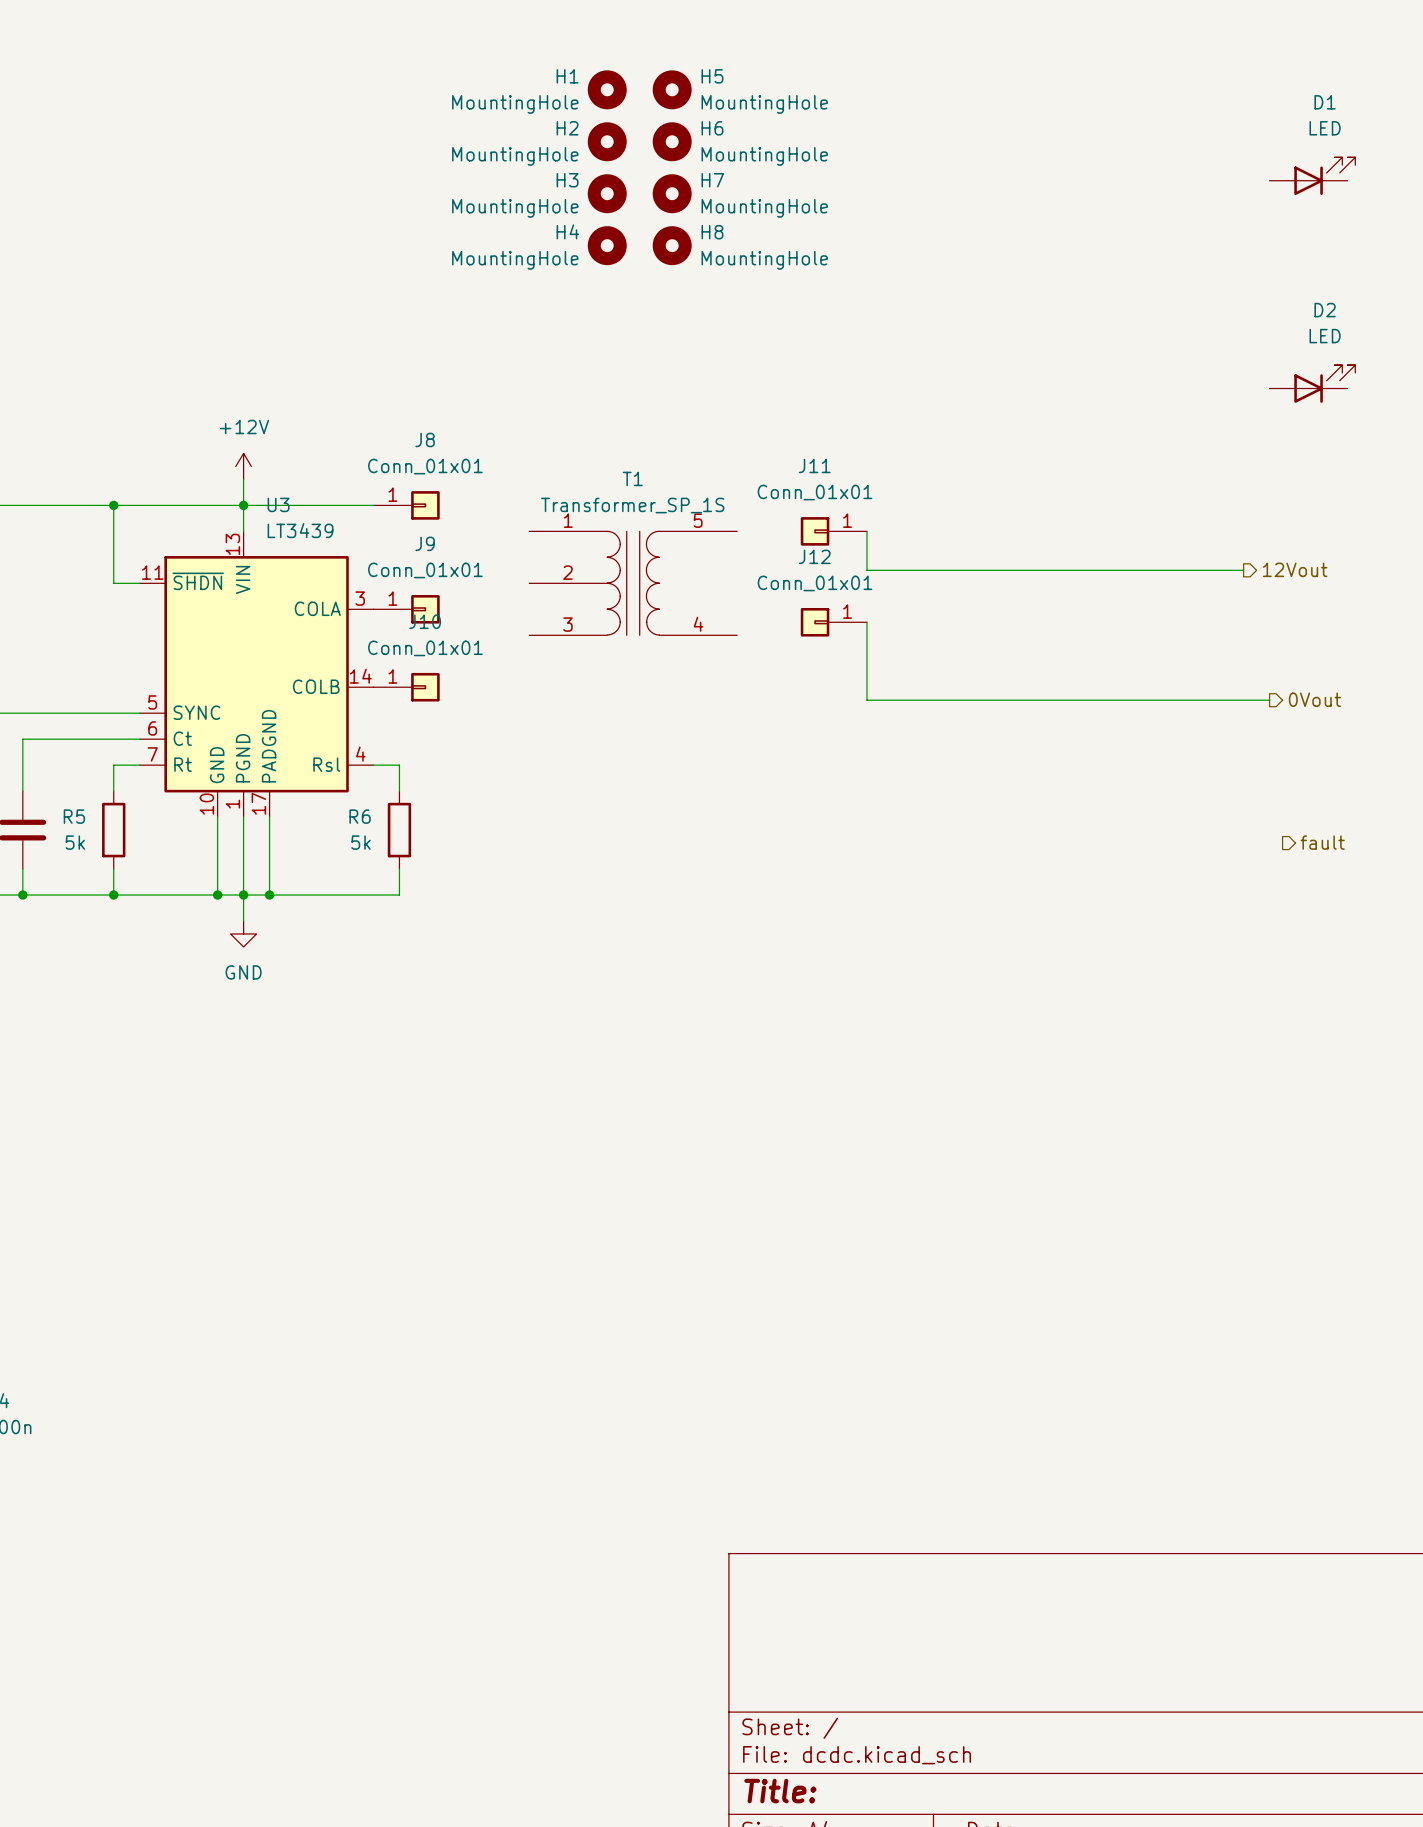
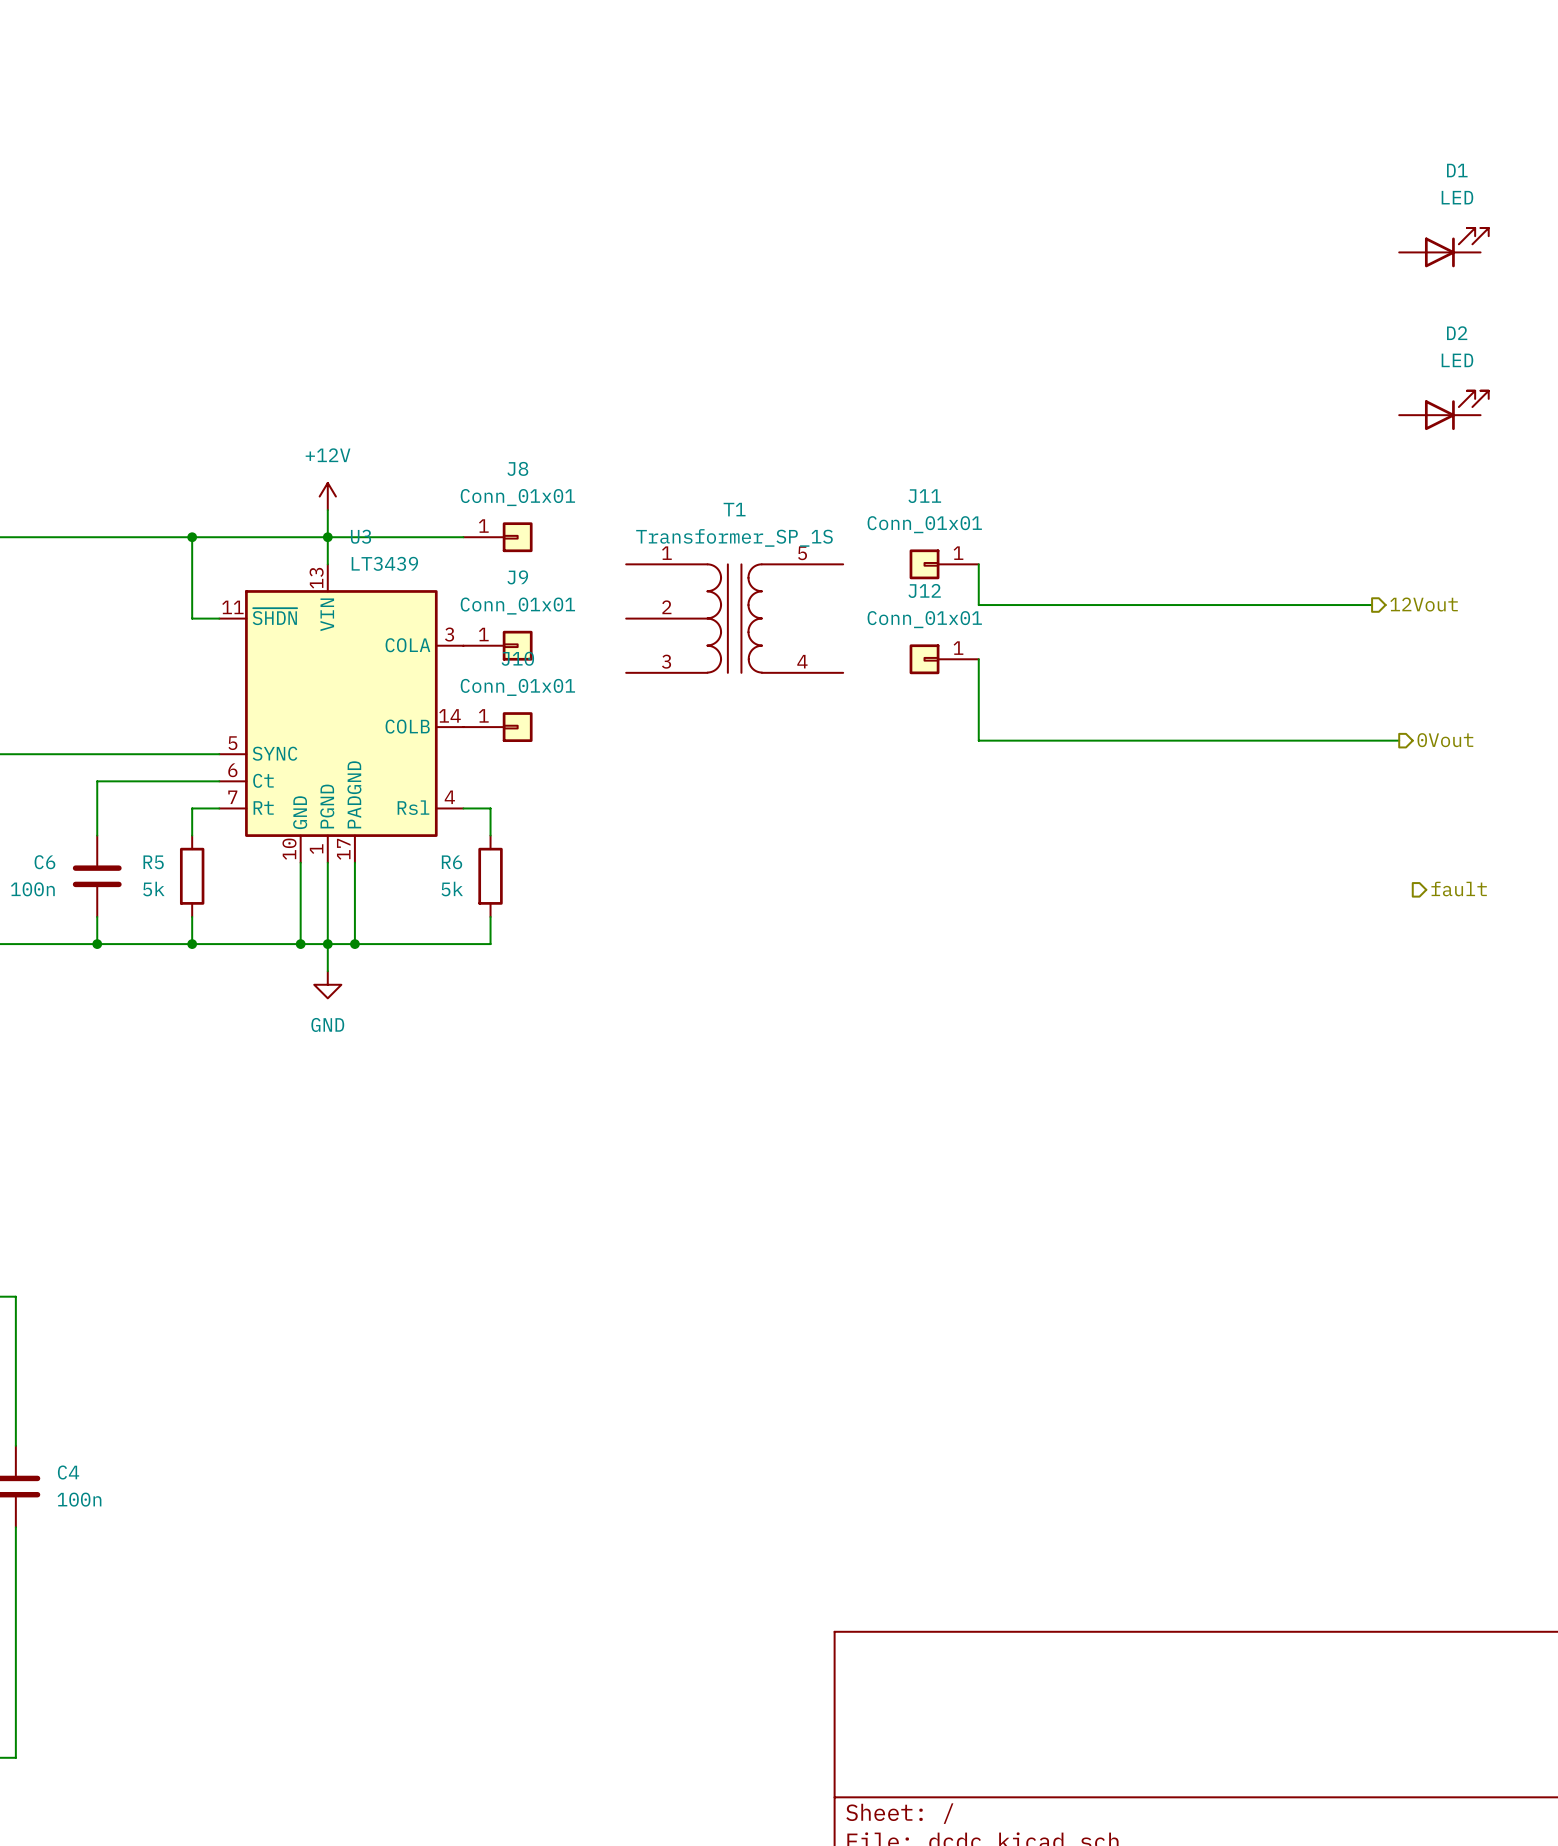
H1: MountingHole (607, 89) -> none
H5: MountingHole (672, 89) -> none
H2: MountingHole (607, 141) -> none
H6: MountingHole (672, 141) -> none
D1 position: (1312, 176) -> (1443, 247)
H3: MountingHole (607, 193) -> none
H7: MountingHole (672, 193) -> none
H4: MountingHole (607, 245) -> none
H8: MountingHole (672, 245) -> none

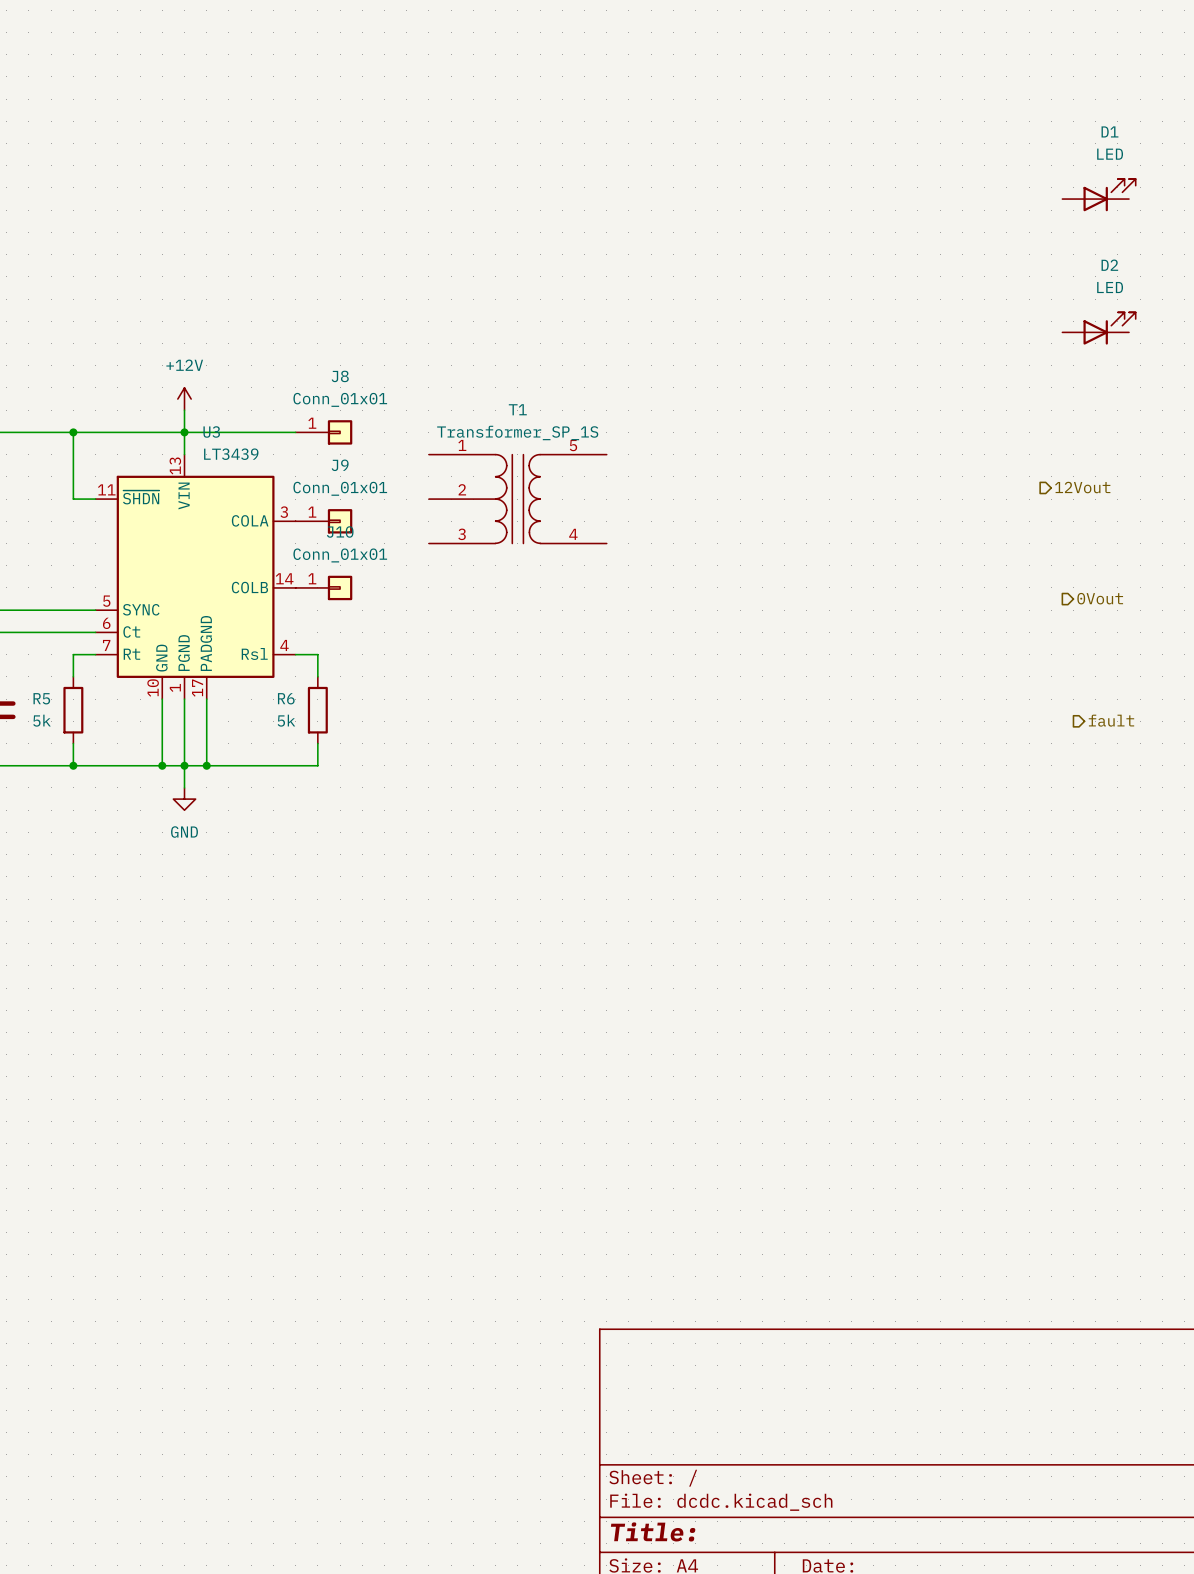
J11: Conn_01x01 (944, 564) -> none
wire: (978, 564) (978, 605) (1372, 605) -> none
J12: Conn_01x01 (944, 659) -> none
wire: (978, 659) (978, 740) (1399, 740) -> none

